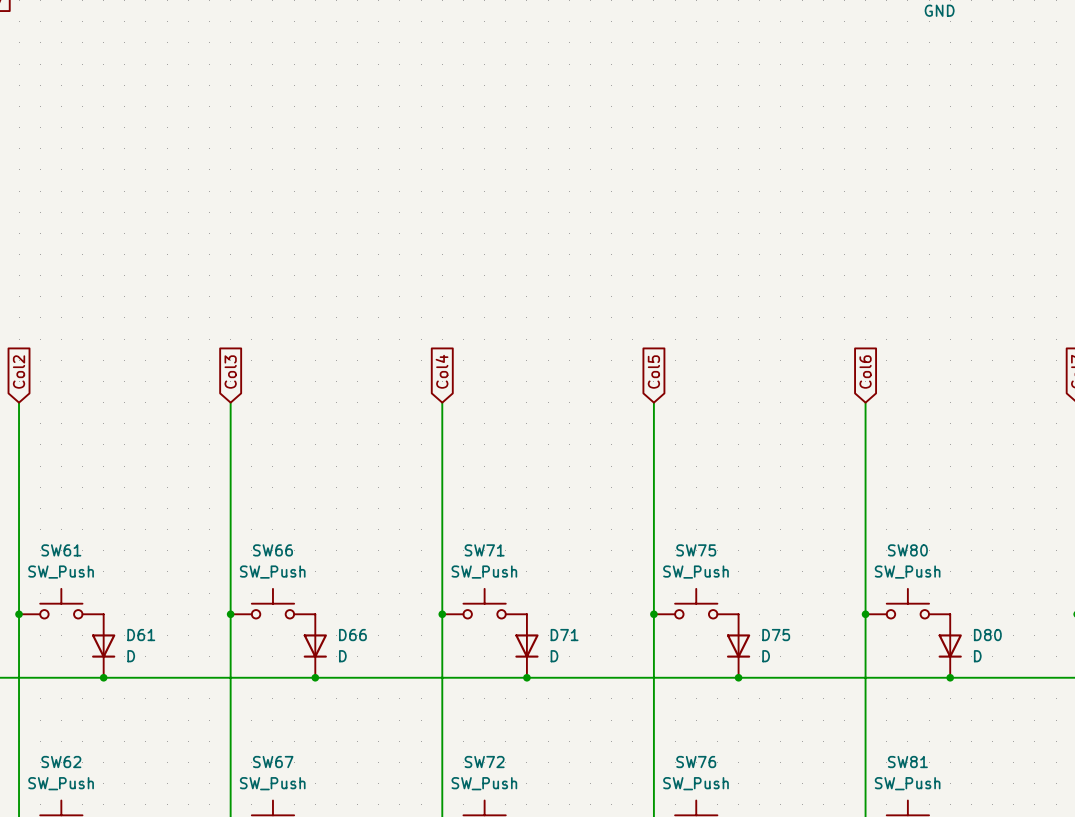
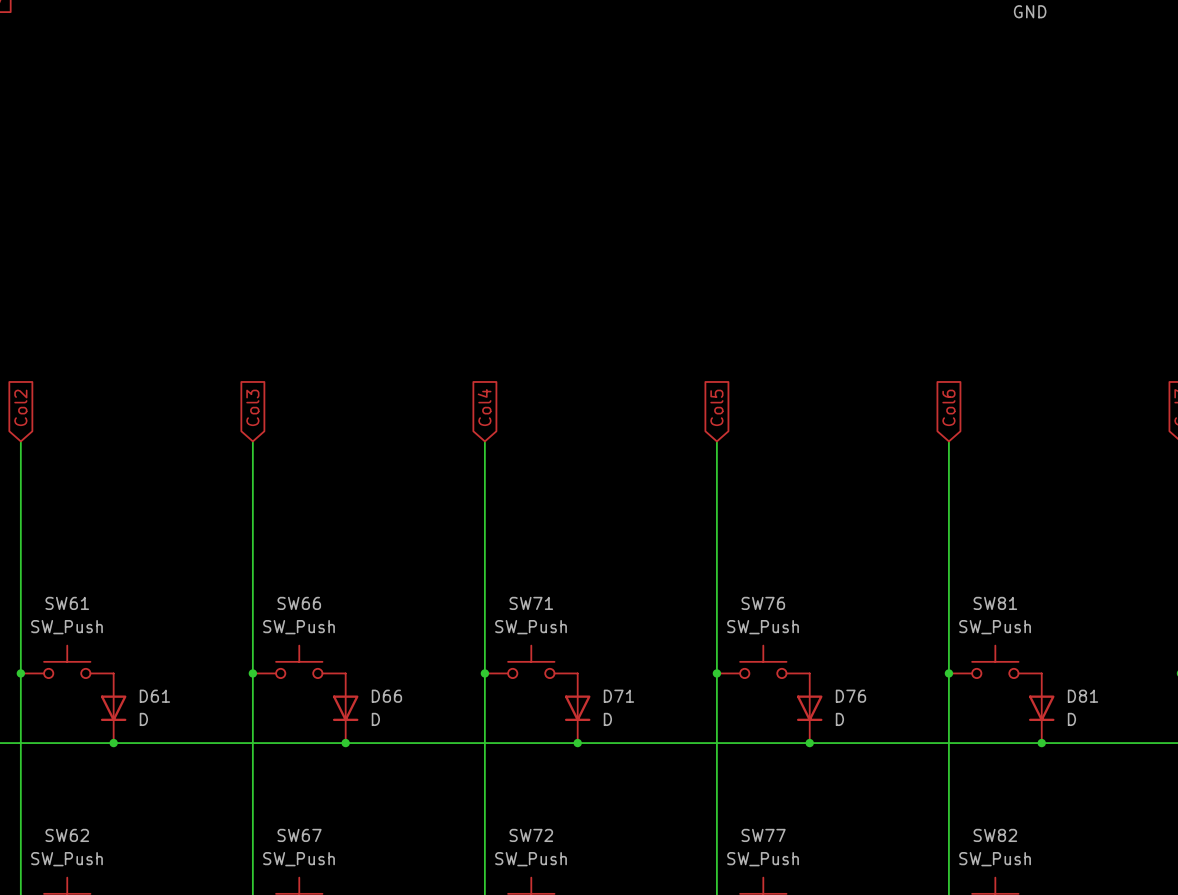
SW75 name: SW75 (696, 550) -> SW76 (763, 603)
SW80 name: SW80 (907, 550) -> SW81 (995, 603)
D75 name: D75 (776, 635) -> D76 (850, 696)
D80 name: D80 (987, 635) -> D81 (1082, 696)
SW76 name: SW76 (696, 762) -> SW77 (763, 835)
SW81 name: SW81 (907, 762) -> SW82 (995, 835)

